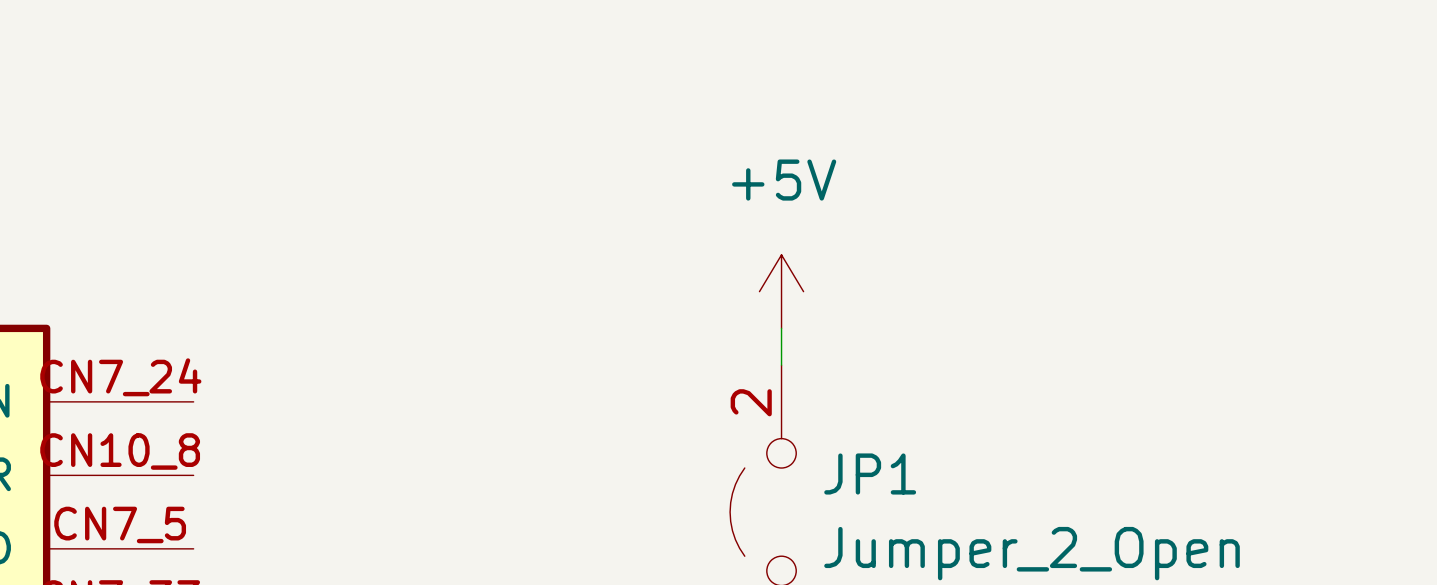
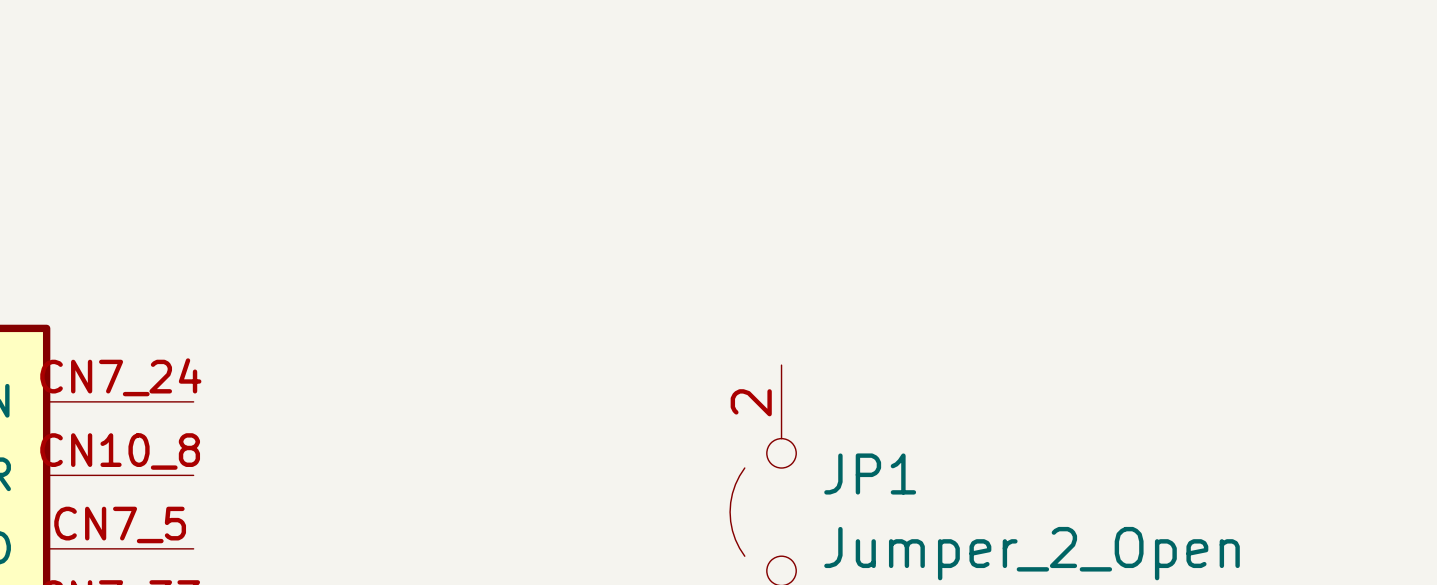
power symbol: +5V (781, 291) -> none
wire: (781, 328) (781, 365) -> none

